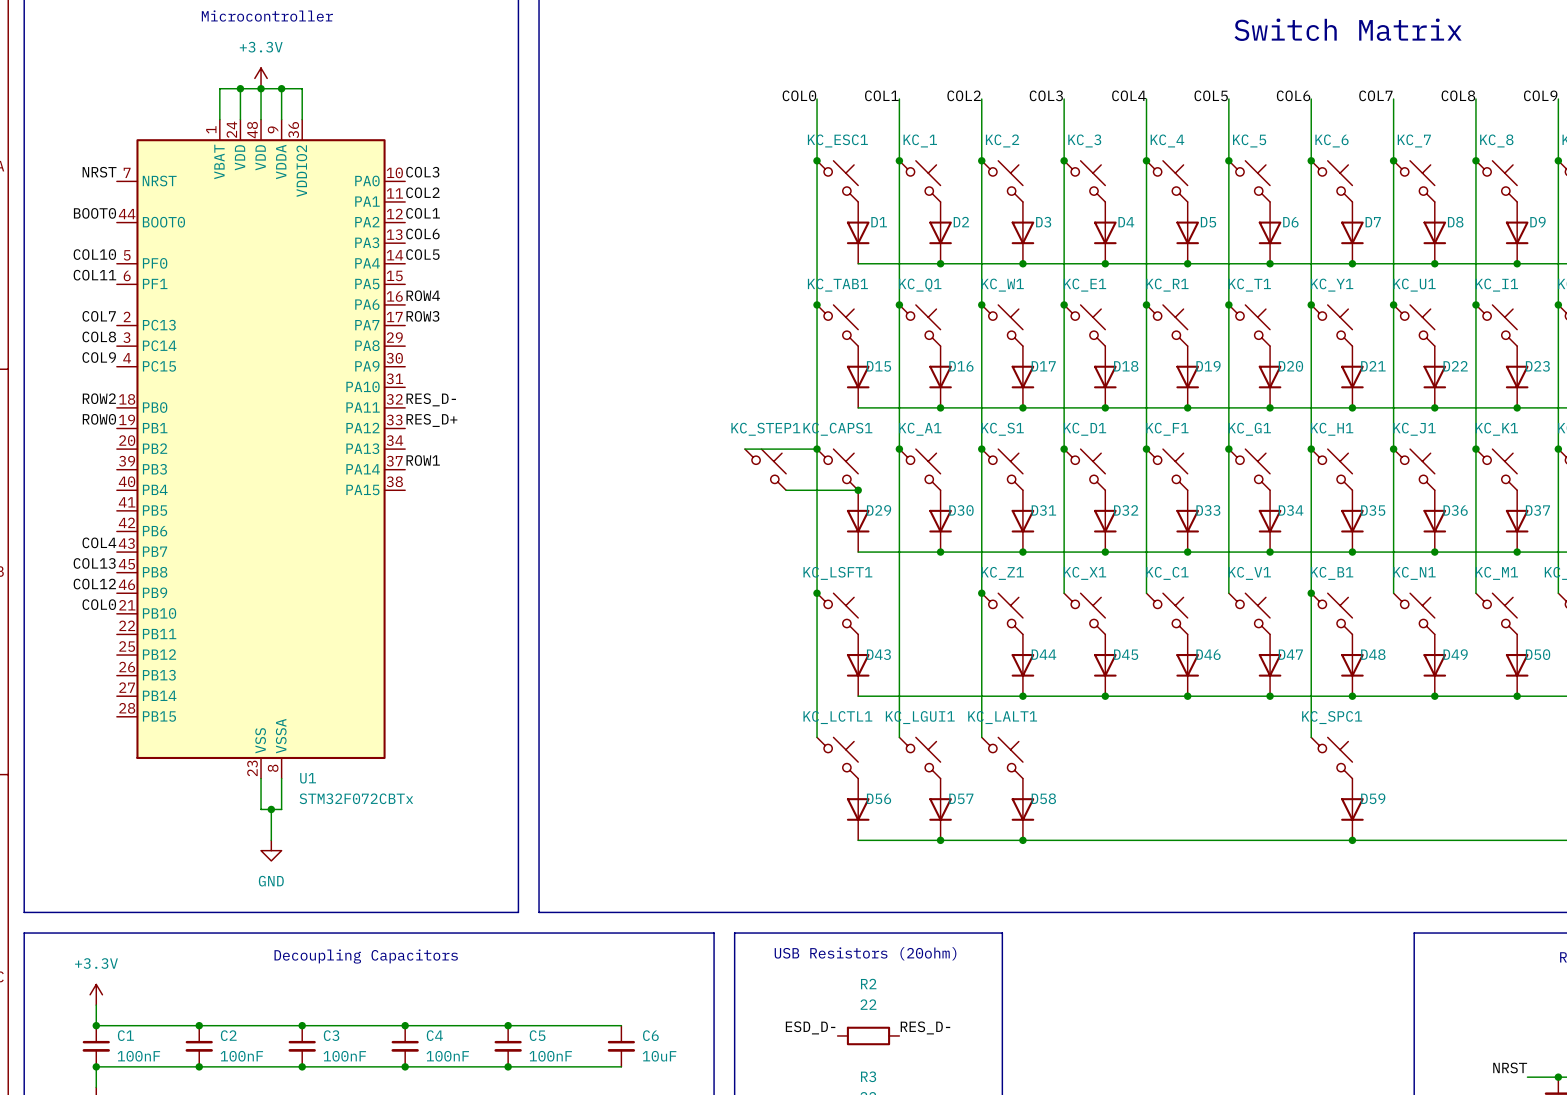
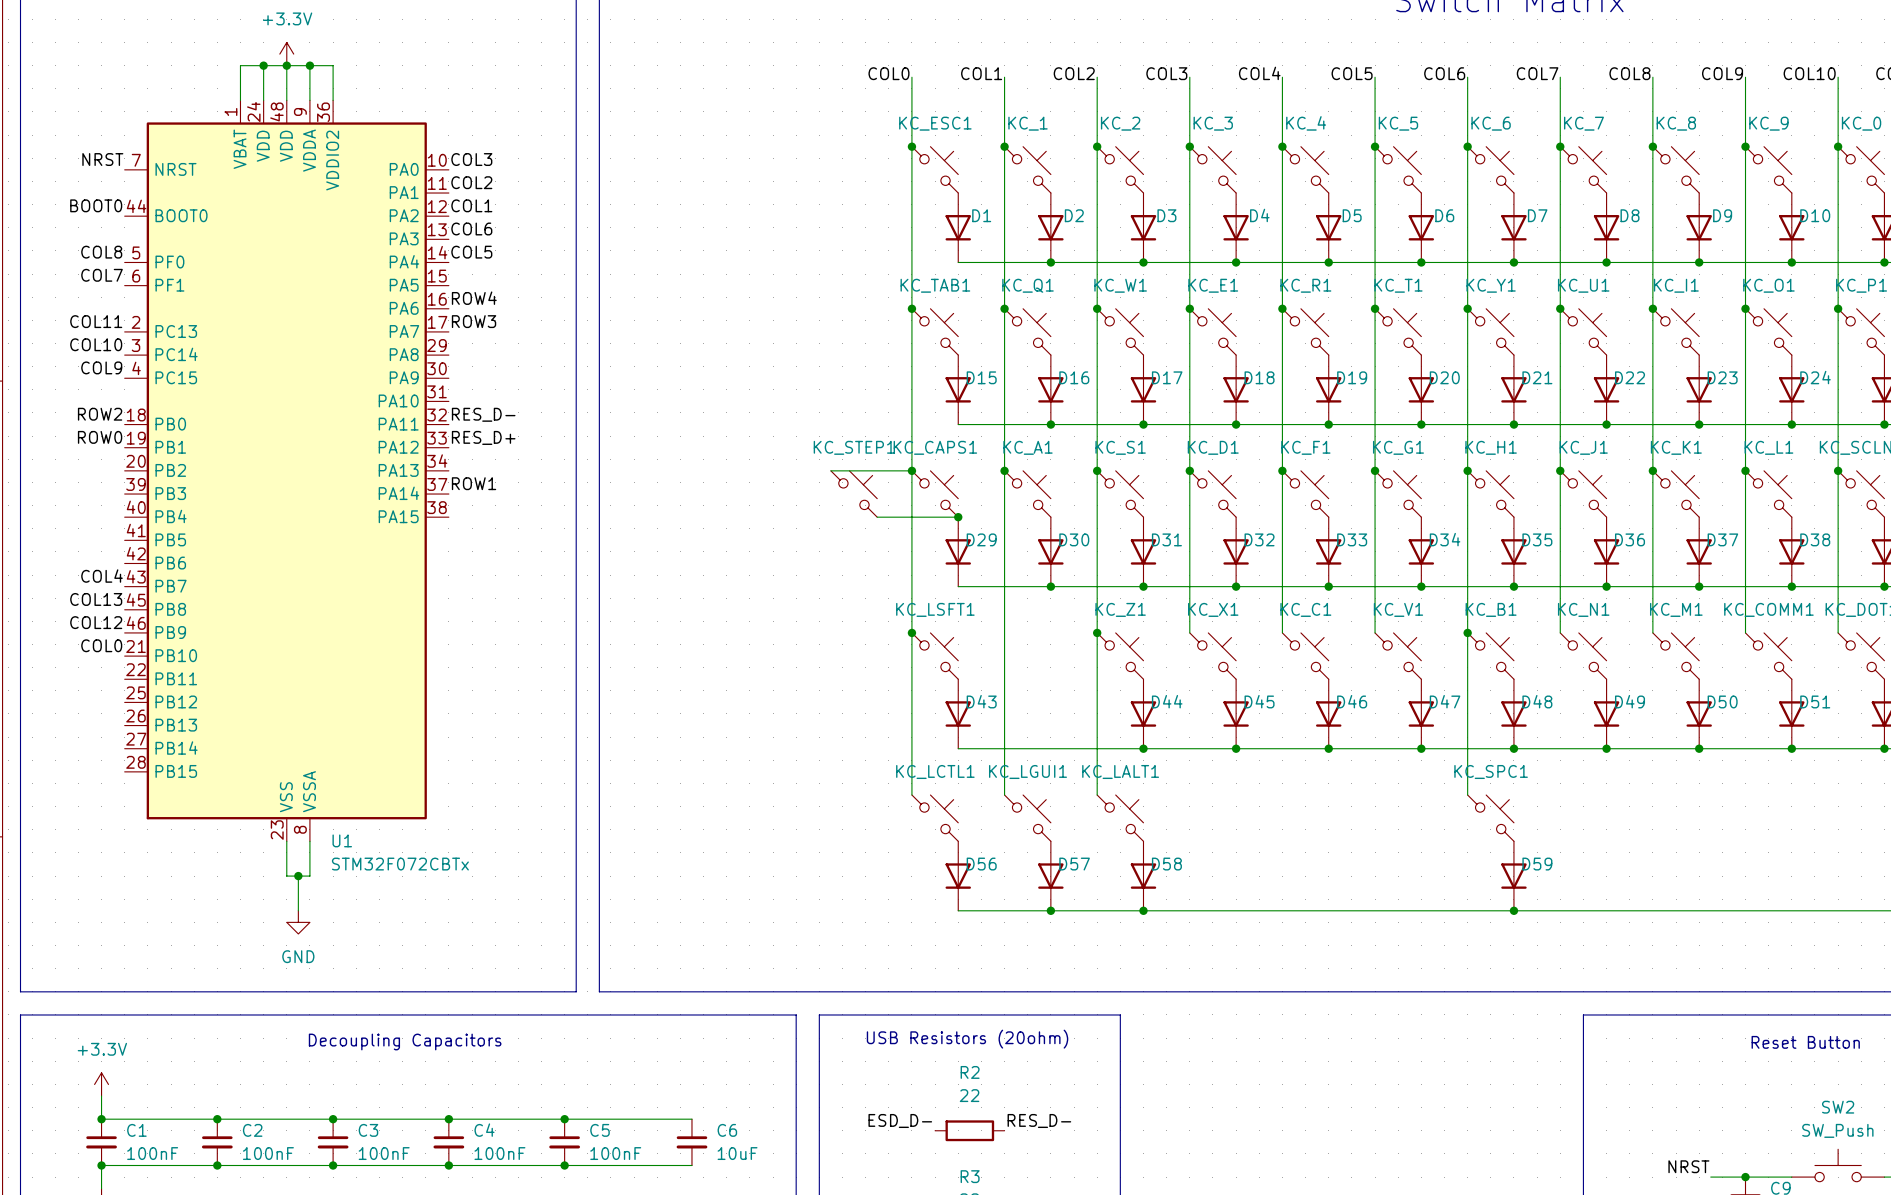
label: COL10 (94, 254) -> COL8 (101, 252)
label: COL11 (94, 275) -> COL7 (102, 275)
label: COL7 (99, 316) -> COL11 (96, 321)
label: COL8 (99, 336) -> COL10 (96, 344)

